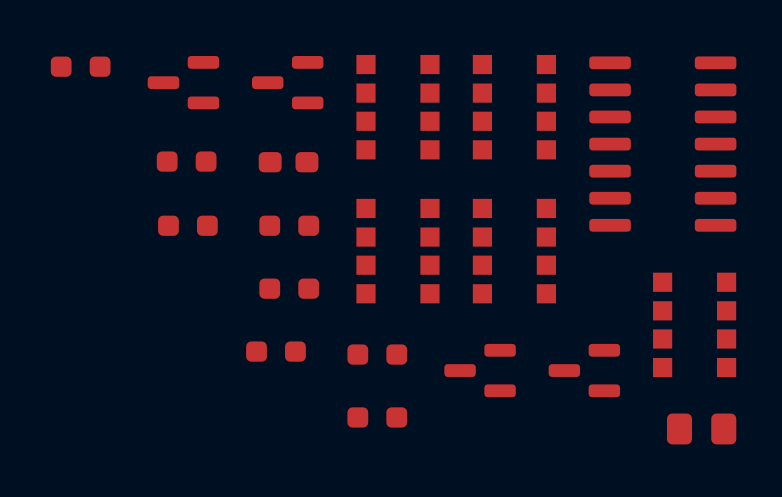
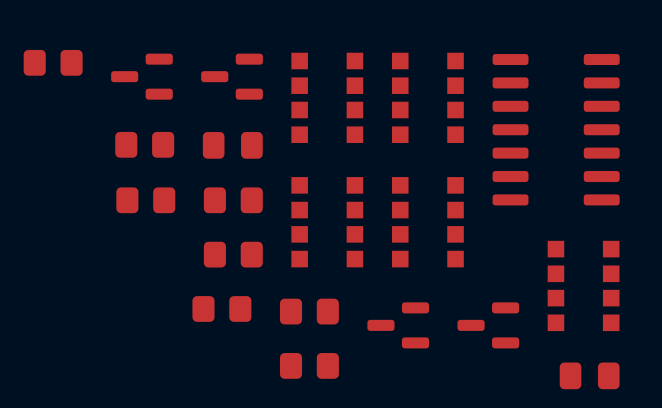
part footprint: [50, 56, 111, 77] -> [23, 49, 83, 76]
part footprint: [156, 151, 217, 172] -> [115, 131, 175, 158]
part footprint: [258, 152, 319, 173] -> [202, 132, 263, 159]
part footprint: [158, 215, 218, 236] -> [116, 187, 176, 214]
part footprint: [259, 215, 320, 236] -> [203, 187, 263, 214]
part footprint: [259, 278, 320, 299] -> [203, 241, 263, 268]
part footprint: [246, 341, 306, 362] -> [192, 296, 252, 322]
part footprint: [347, 344, 408, 365] -> [279, 298, 339, 325]
part footprint: [347, 407, 408, 428] -> [279, 353, 339, 379]

